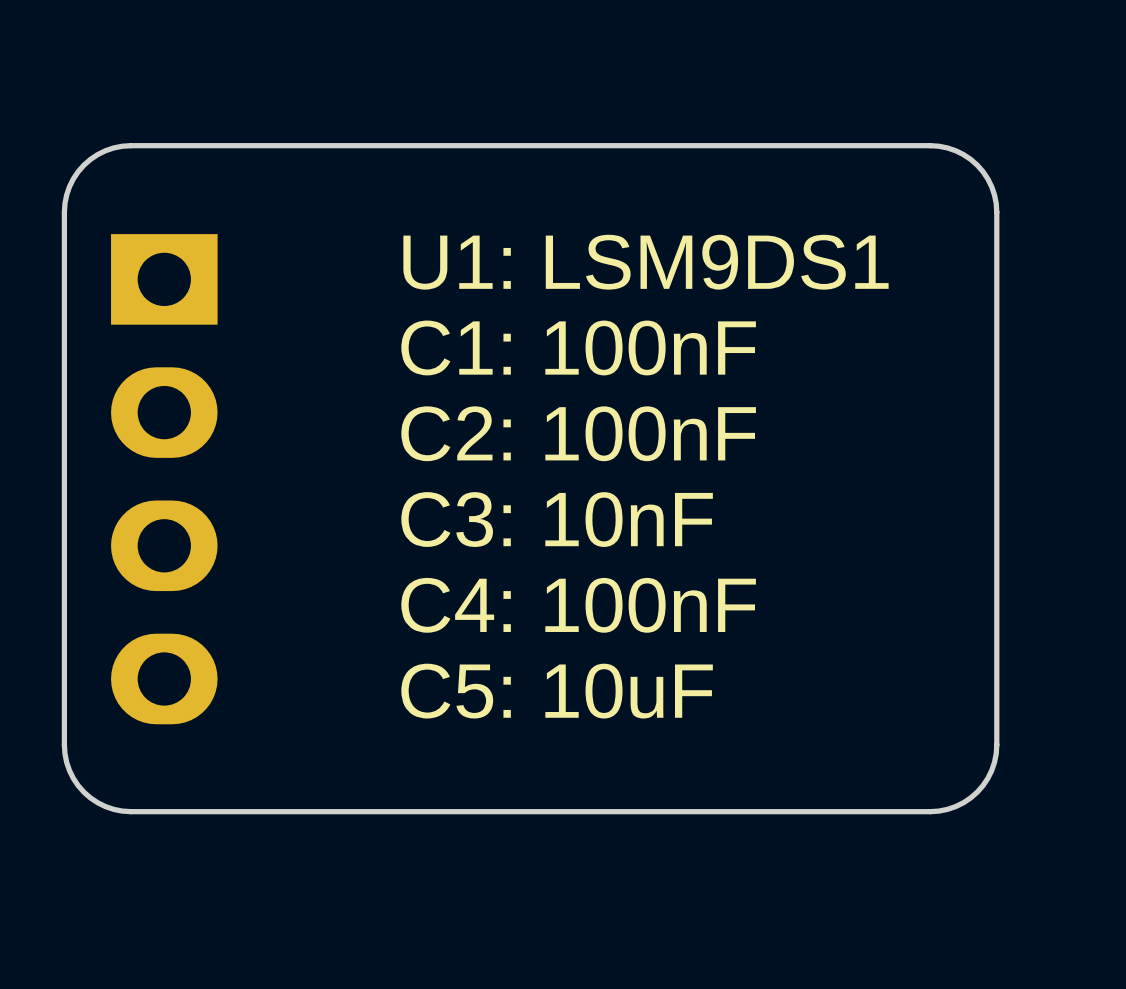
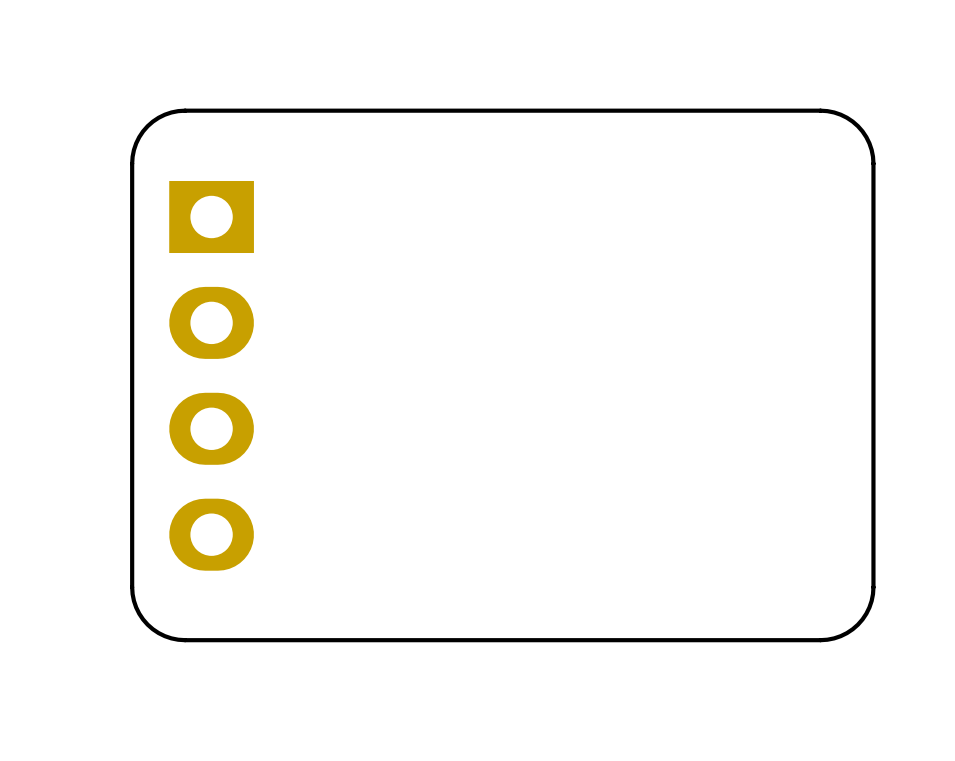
text: U1: LSM9DS1 (645, 262) -> none
text: C1: 100nF (578, 347) -> none
text: C2: 100nF (578, 433) -> none
text: C3: 10nF (557, 519) -> none
text: C4: 100nF (578, 605) -> none
text: C5: 10uF (557, 691) -> none

